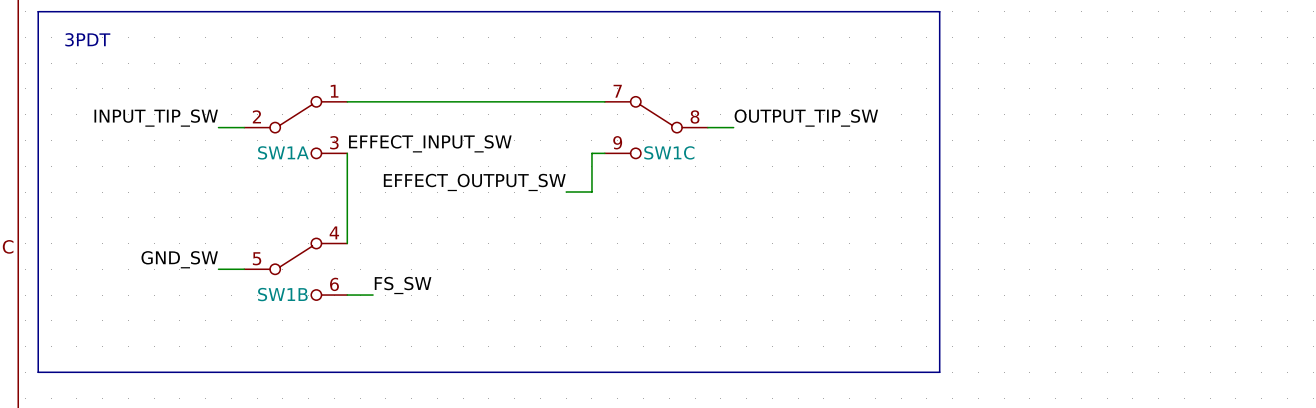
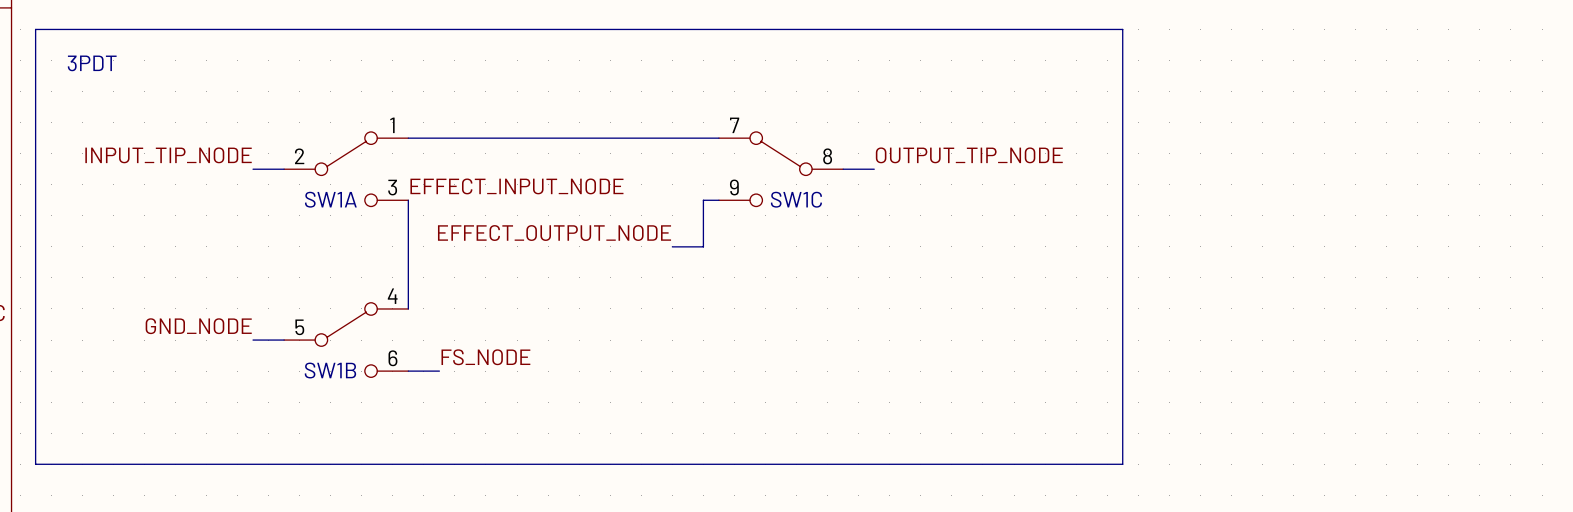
label: INPUT_TIP_SW (156, 118) -> INPUT_TIP_NODE (168, 155)
label: OUTPUT_TIP_SW (806, 118) -> OUTPUT_TIP_NODE (969, 155)
label: EFFECT_INPUT_SW (430, 143) -> EFFECT_INPUT_NODE (516, 186)
label: EFFECT_OUTPUT_SW (474, 182) -> EFFECT_OUTPUT_NODE (554, 233)
label: GND_SW (179, 259) -> GND_NODE (198, 326)
label: FS_SW (403, 285) -> FS_NODE (485, 357)

